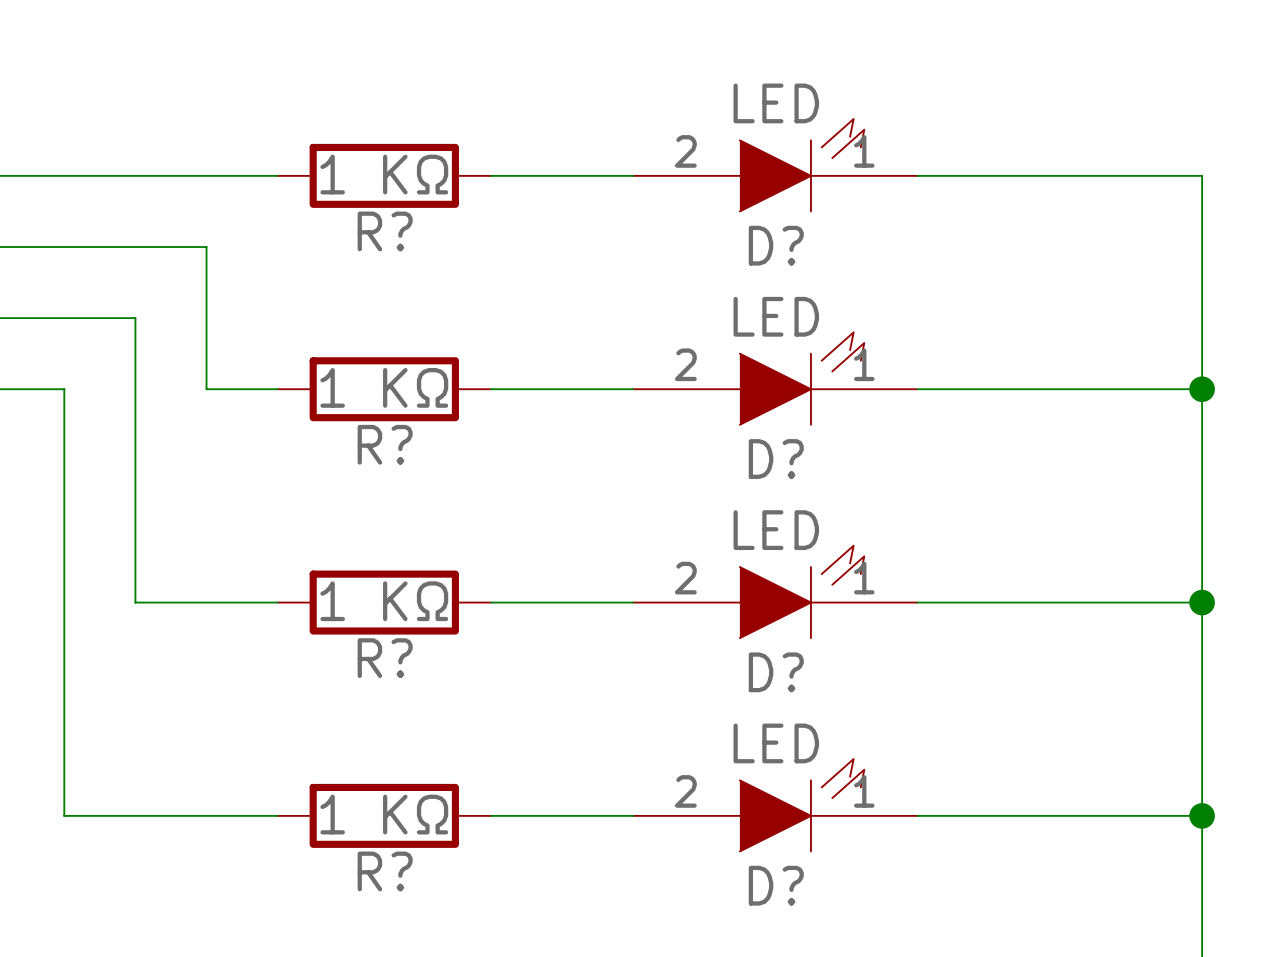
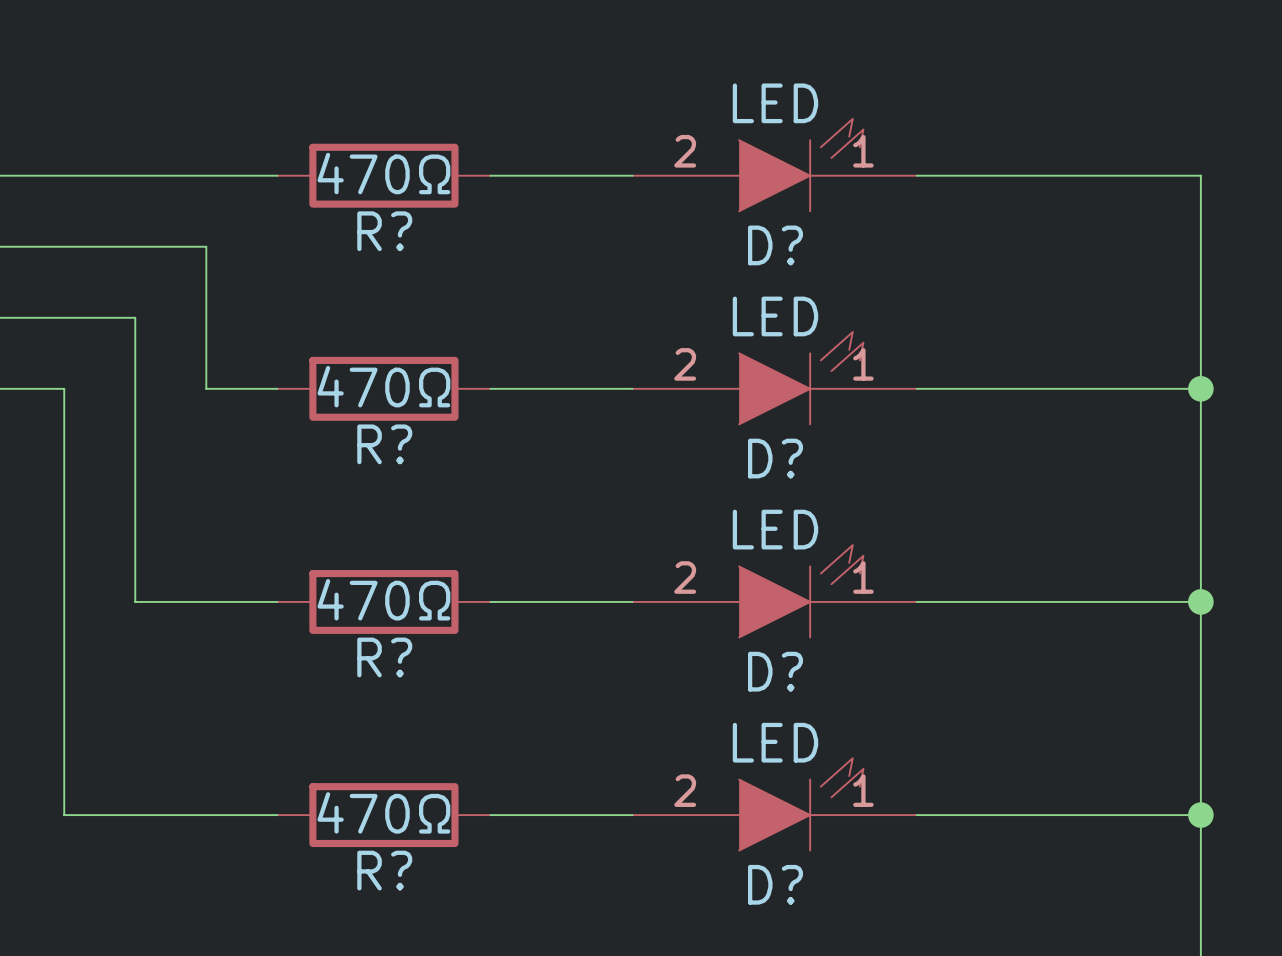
R? value: 1 KΩ (384, 174) -> 470Ω (383, 173)
R? value: 1 KΩ (384, 387) -> 470Ω (383, 386)
R? value: 1 KΩ (384, 601) -> 470Ω (383, 599)
R? value: 1 KΩ (384, 814) -> 470Ω (383, 812)

